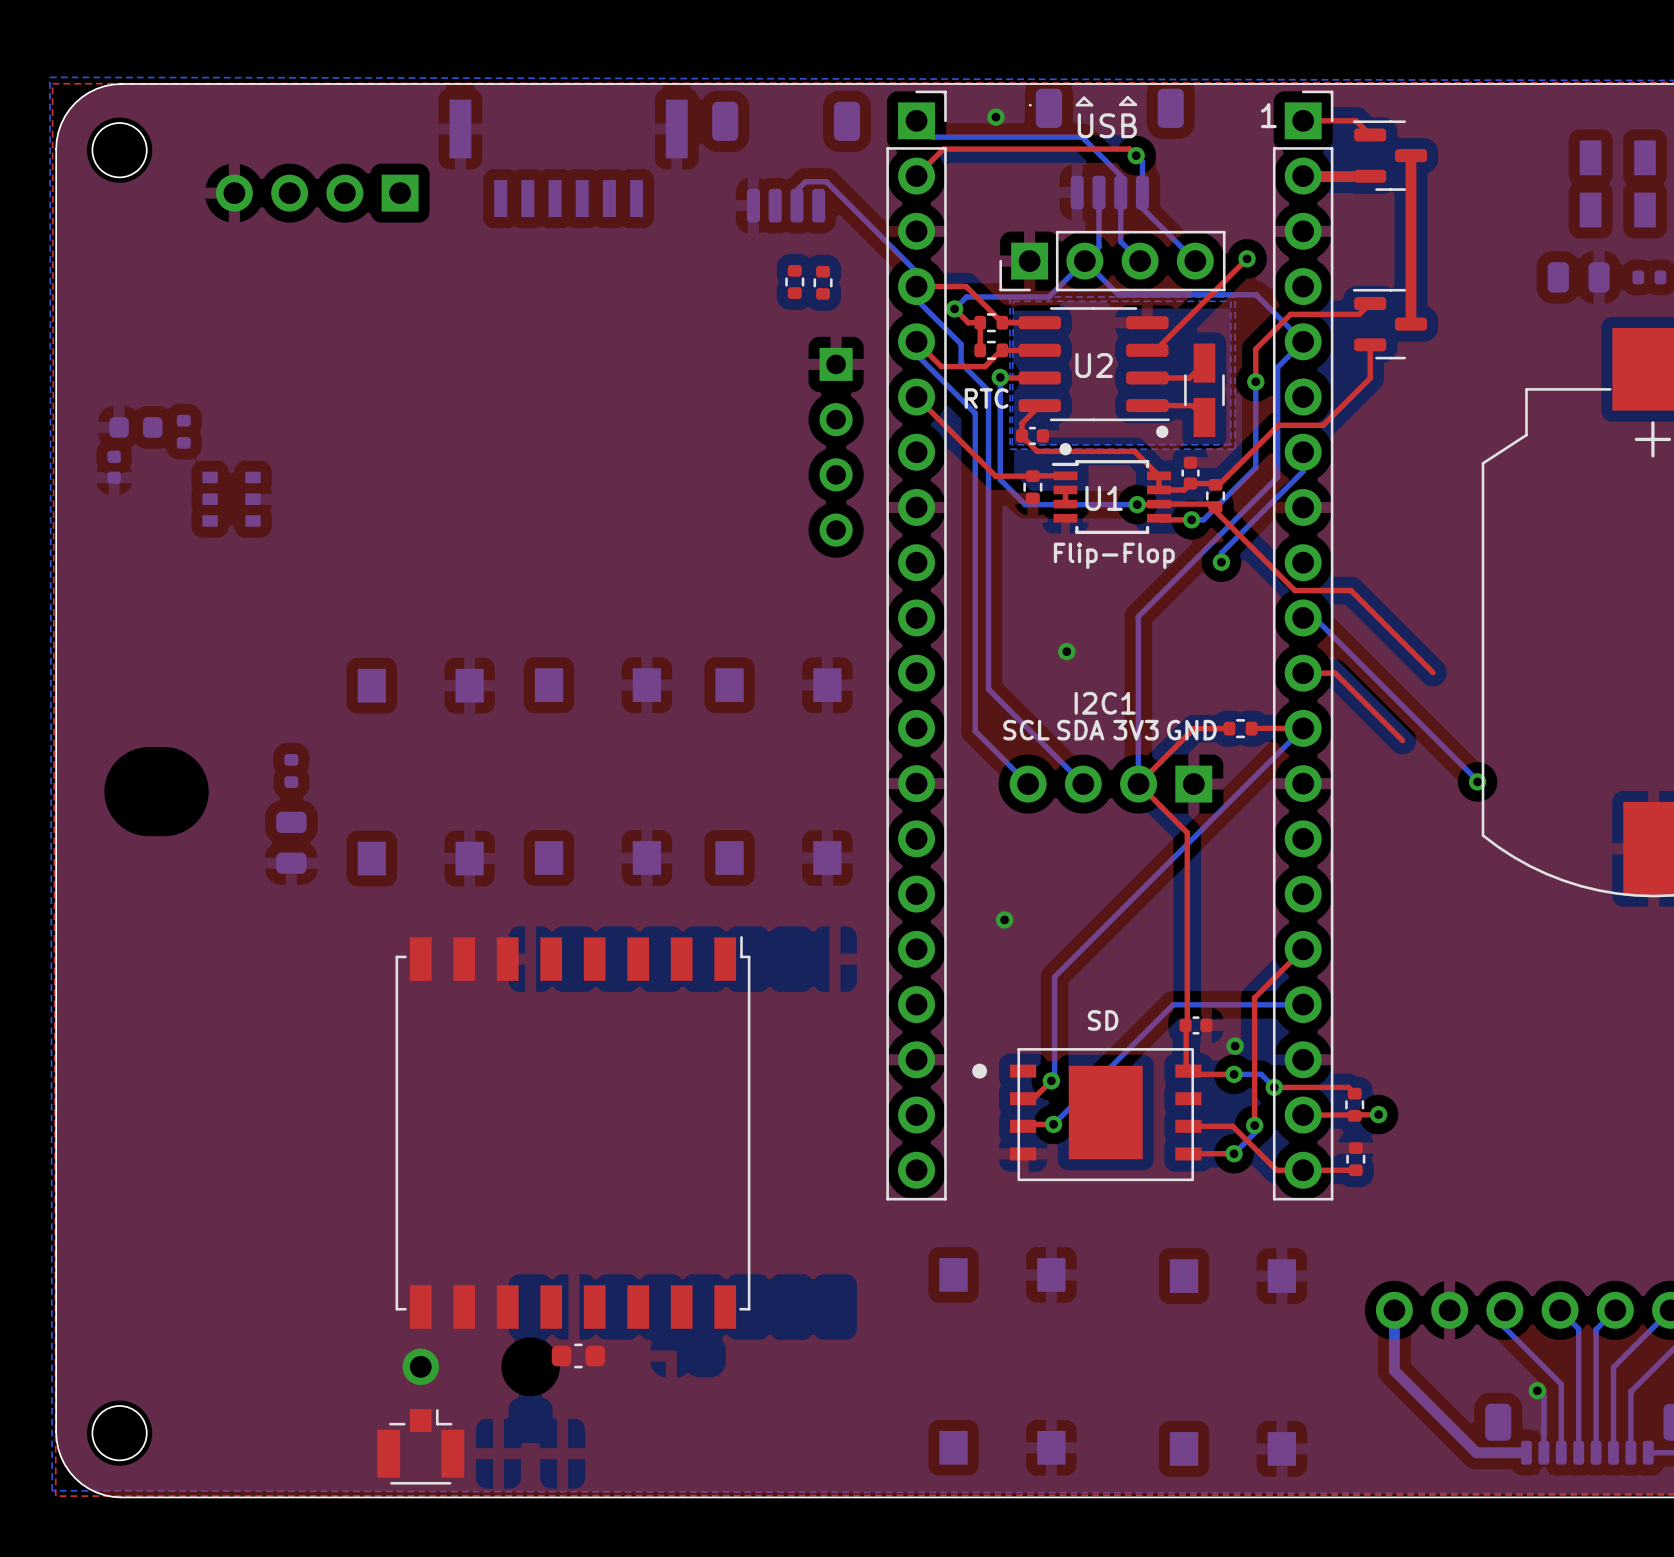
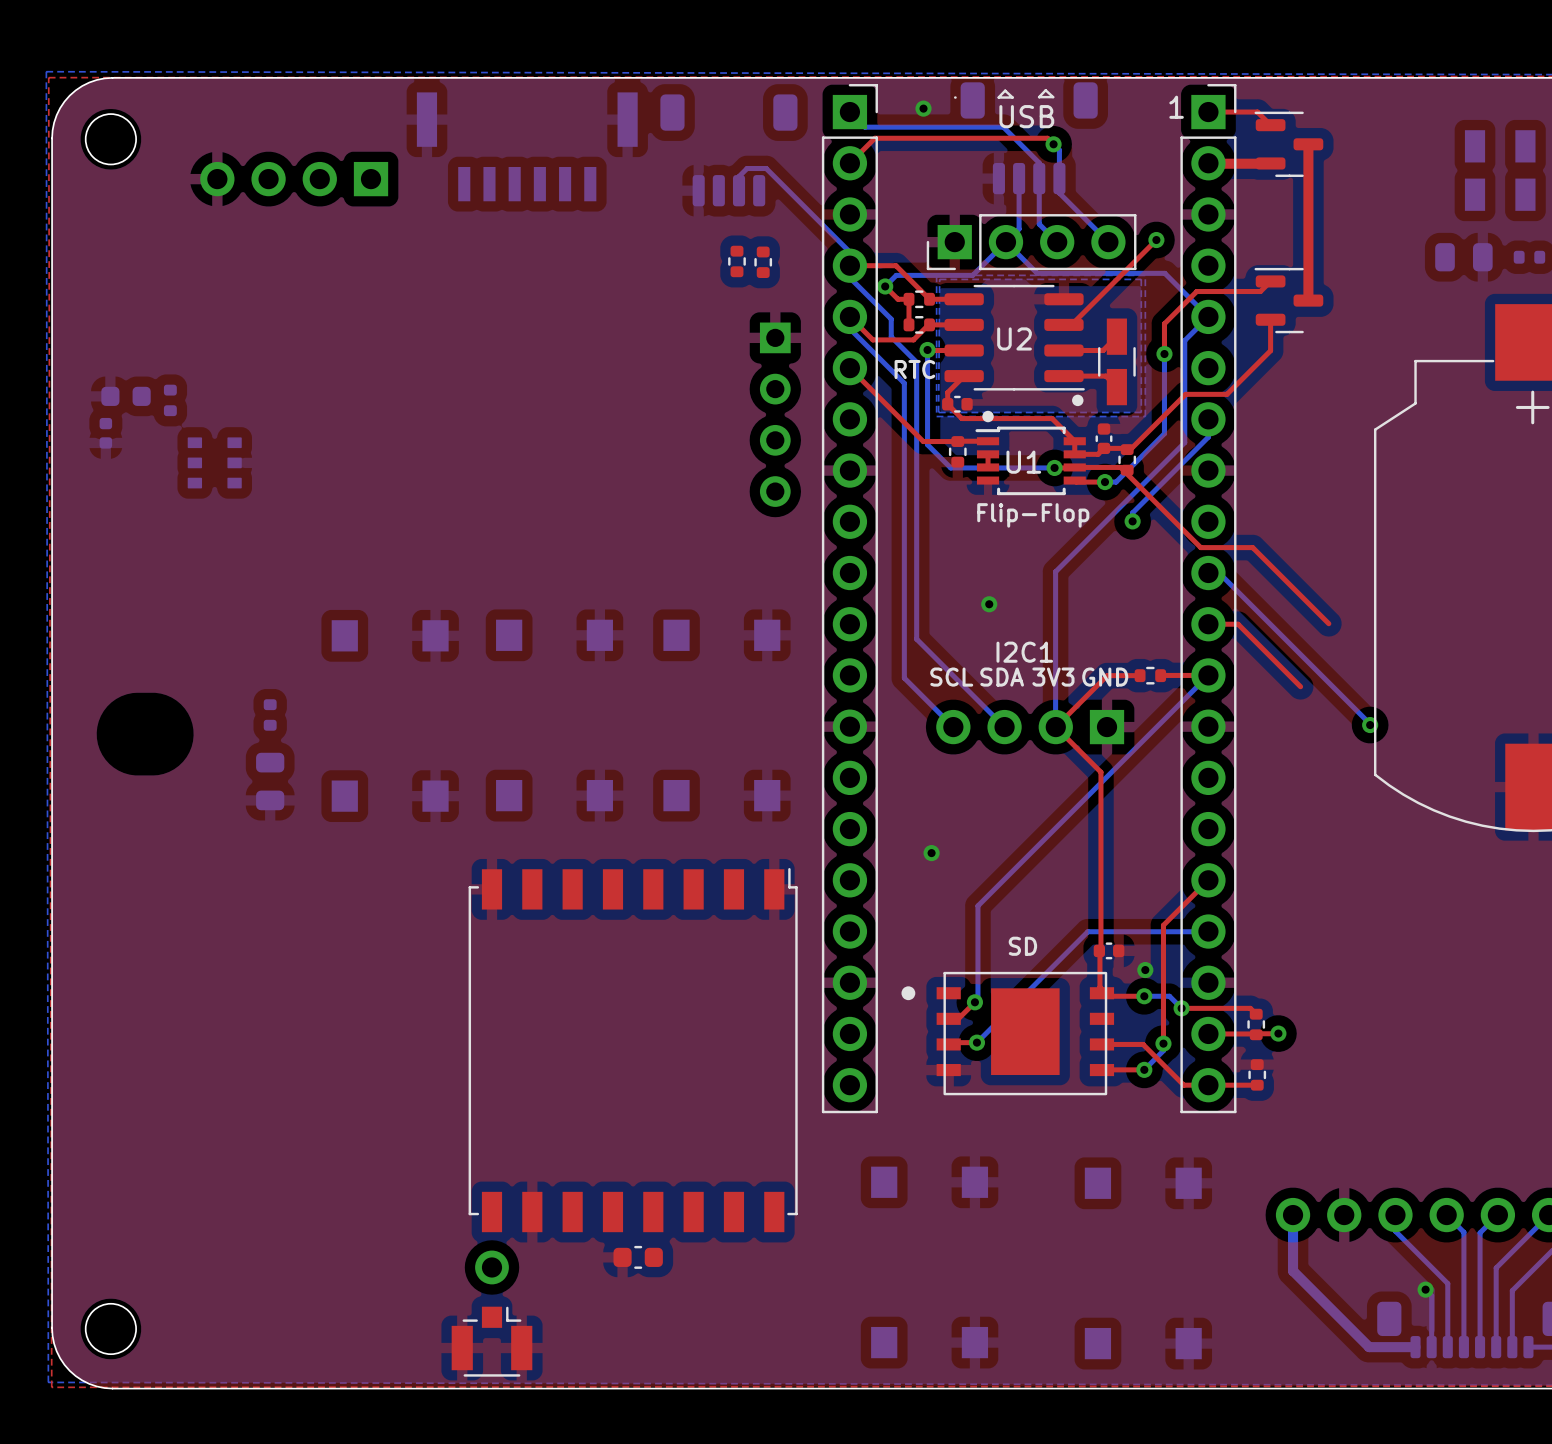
part position: (572, 1132) -> (633, 1050)
part position: (578, 1355) -> (638, 1257)
part position: (420, 1366) -> (491, 1267)
part position: (420, 1446) -> (491, 1341)

